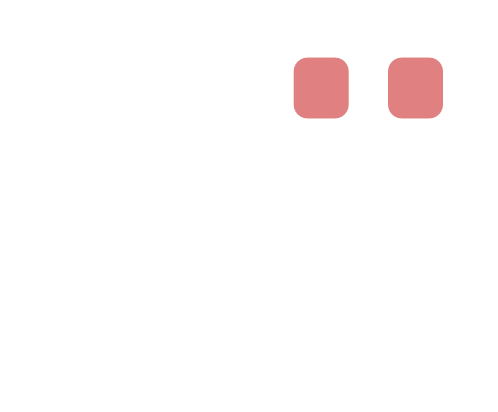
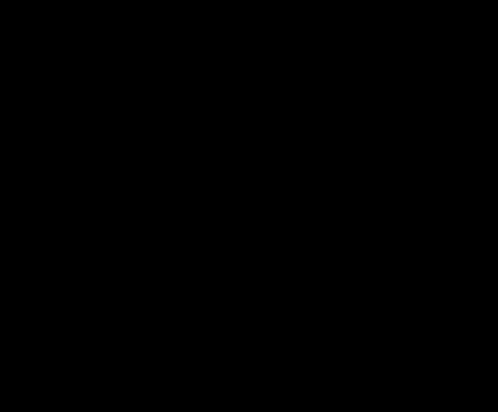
part: (368, 88) -> none

